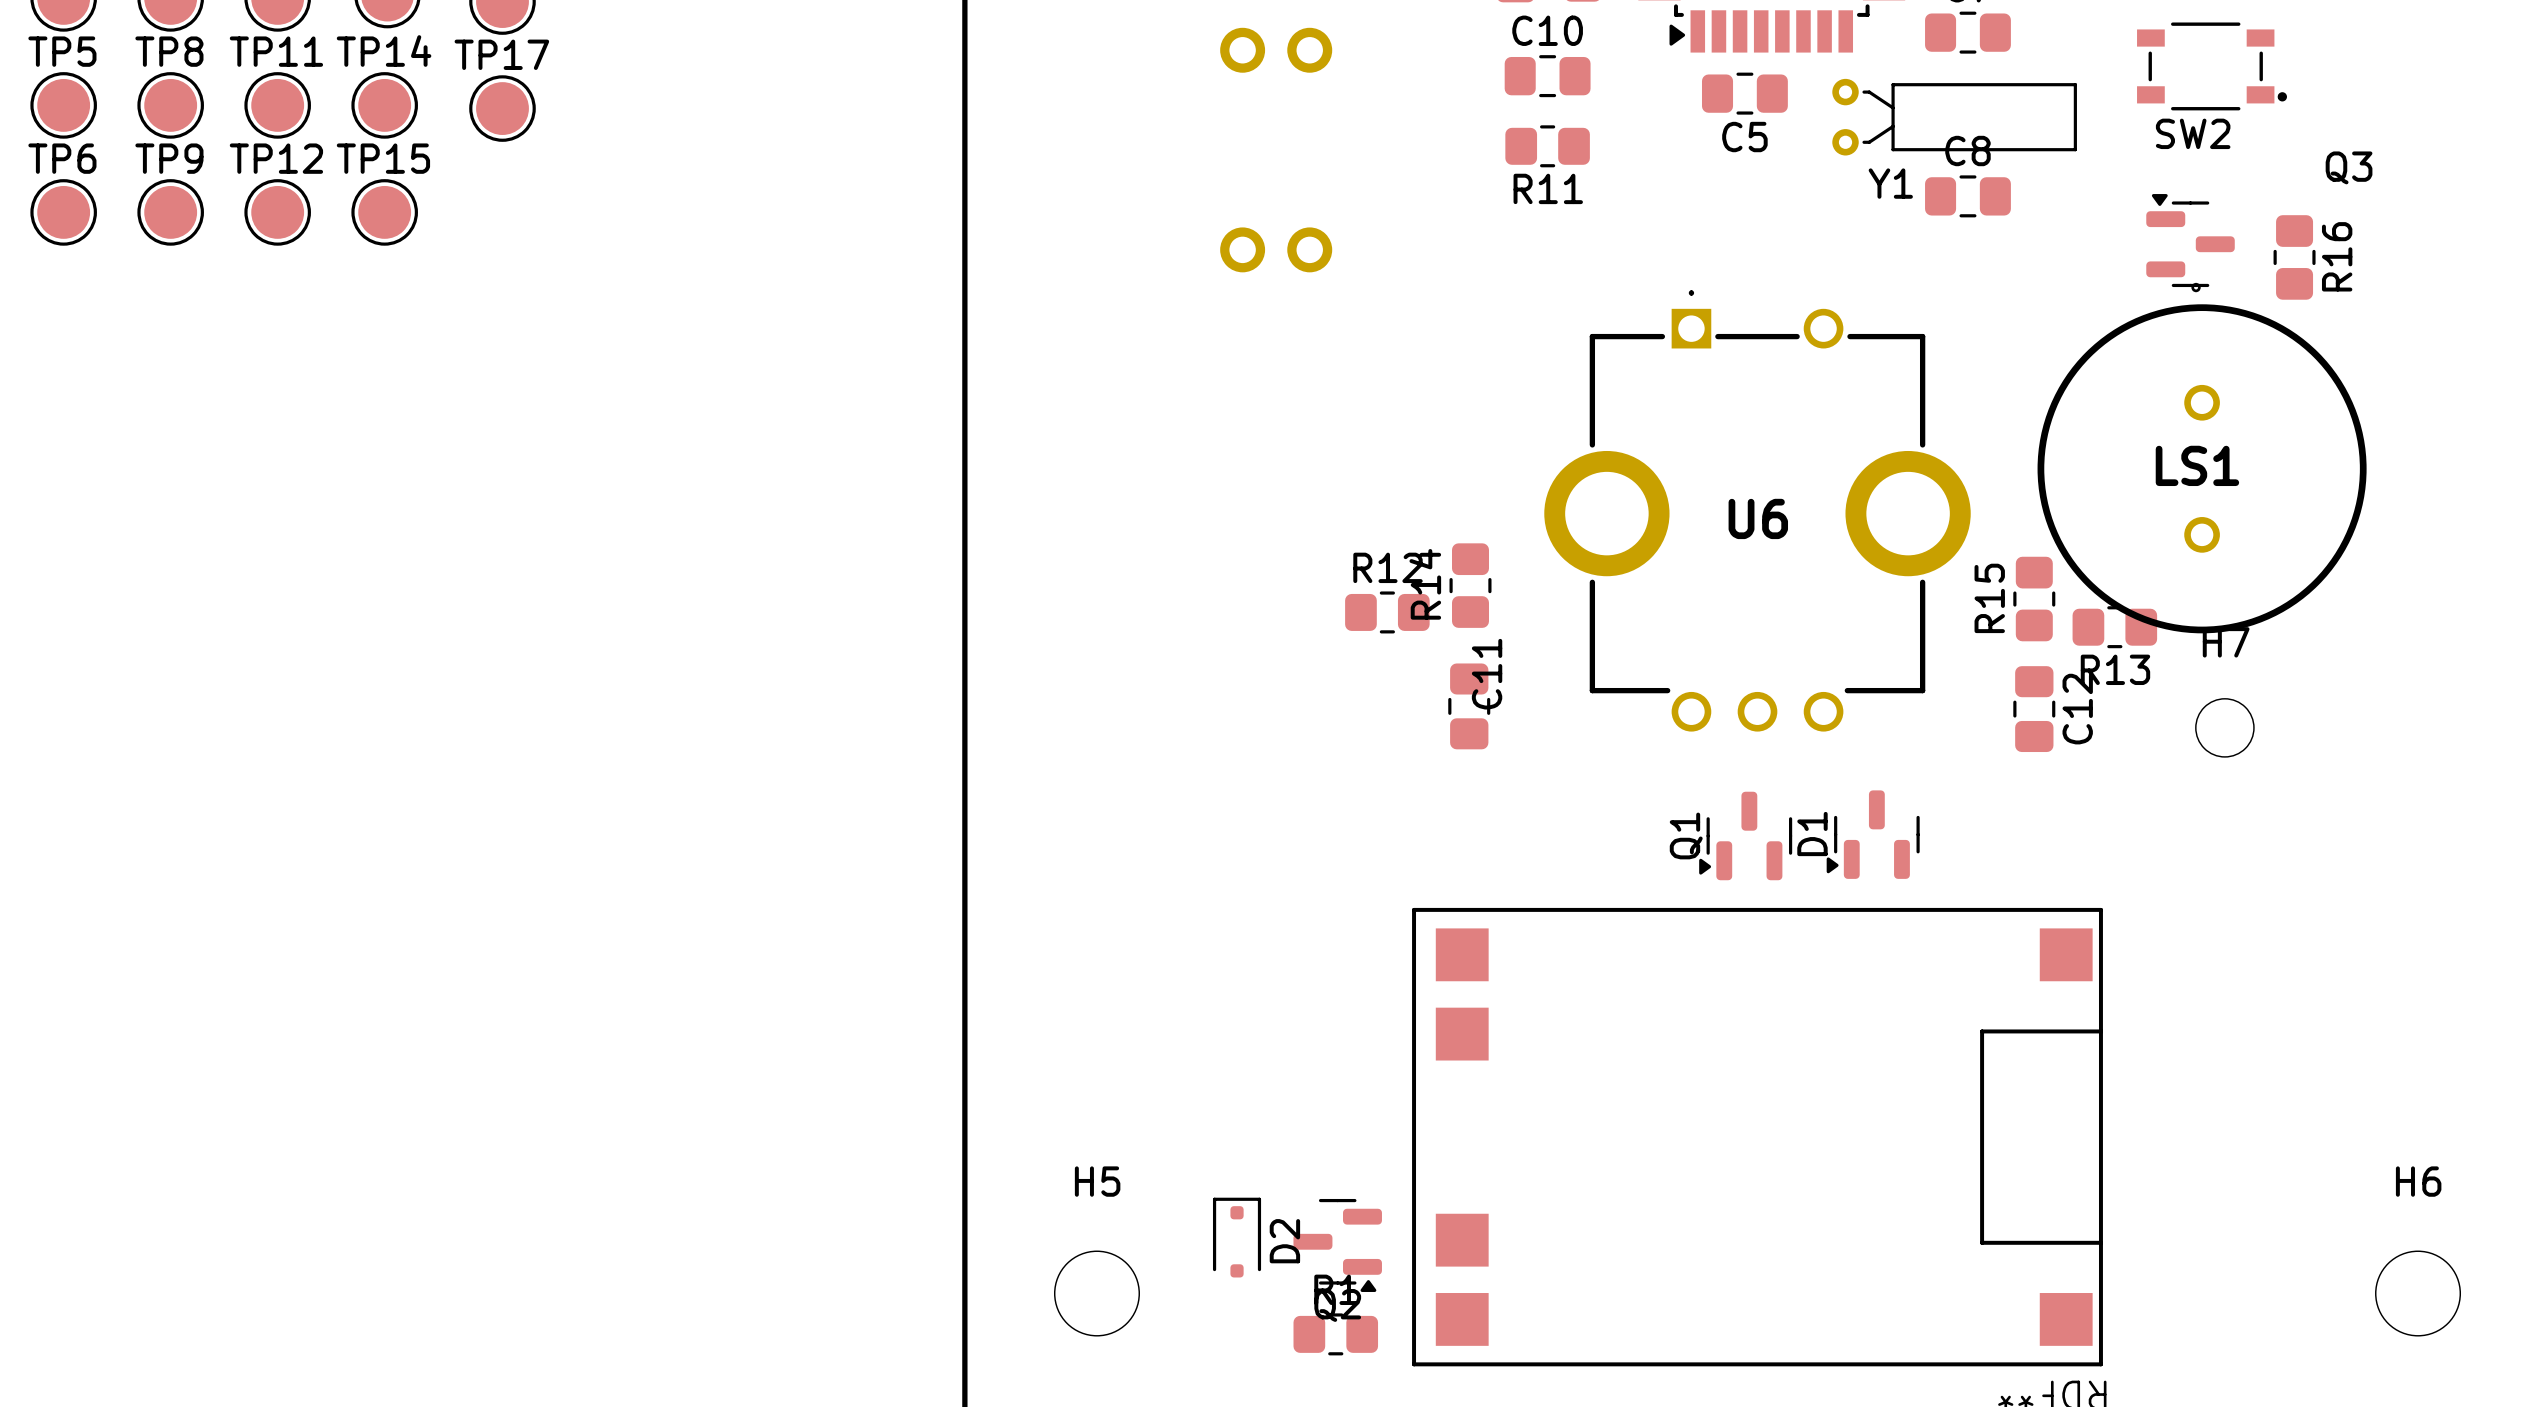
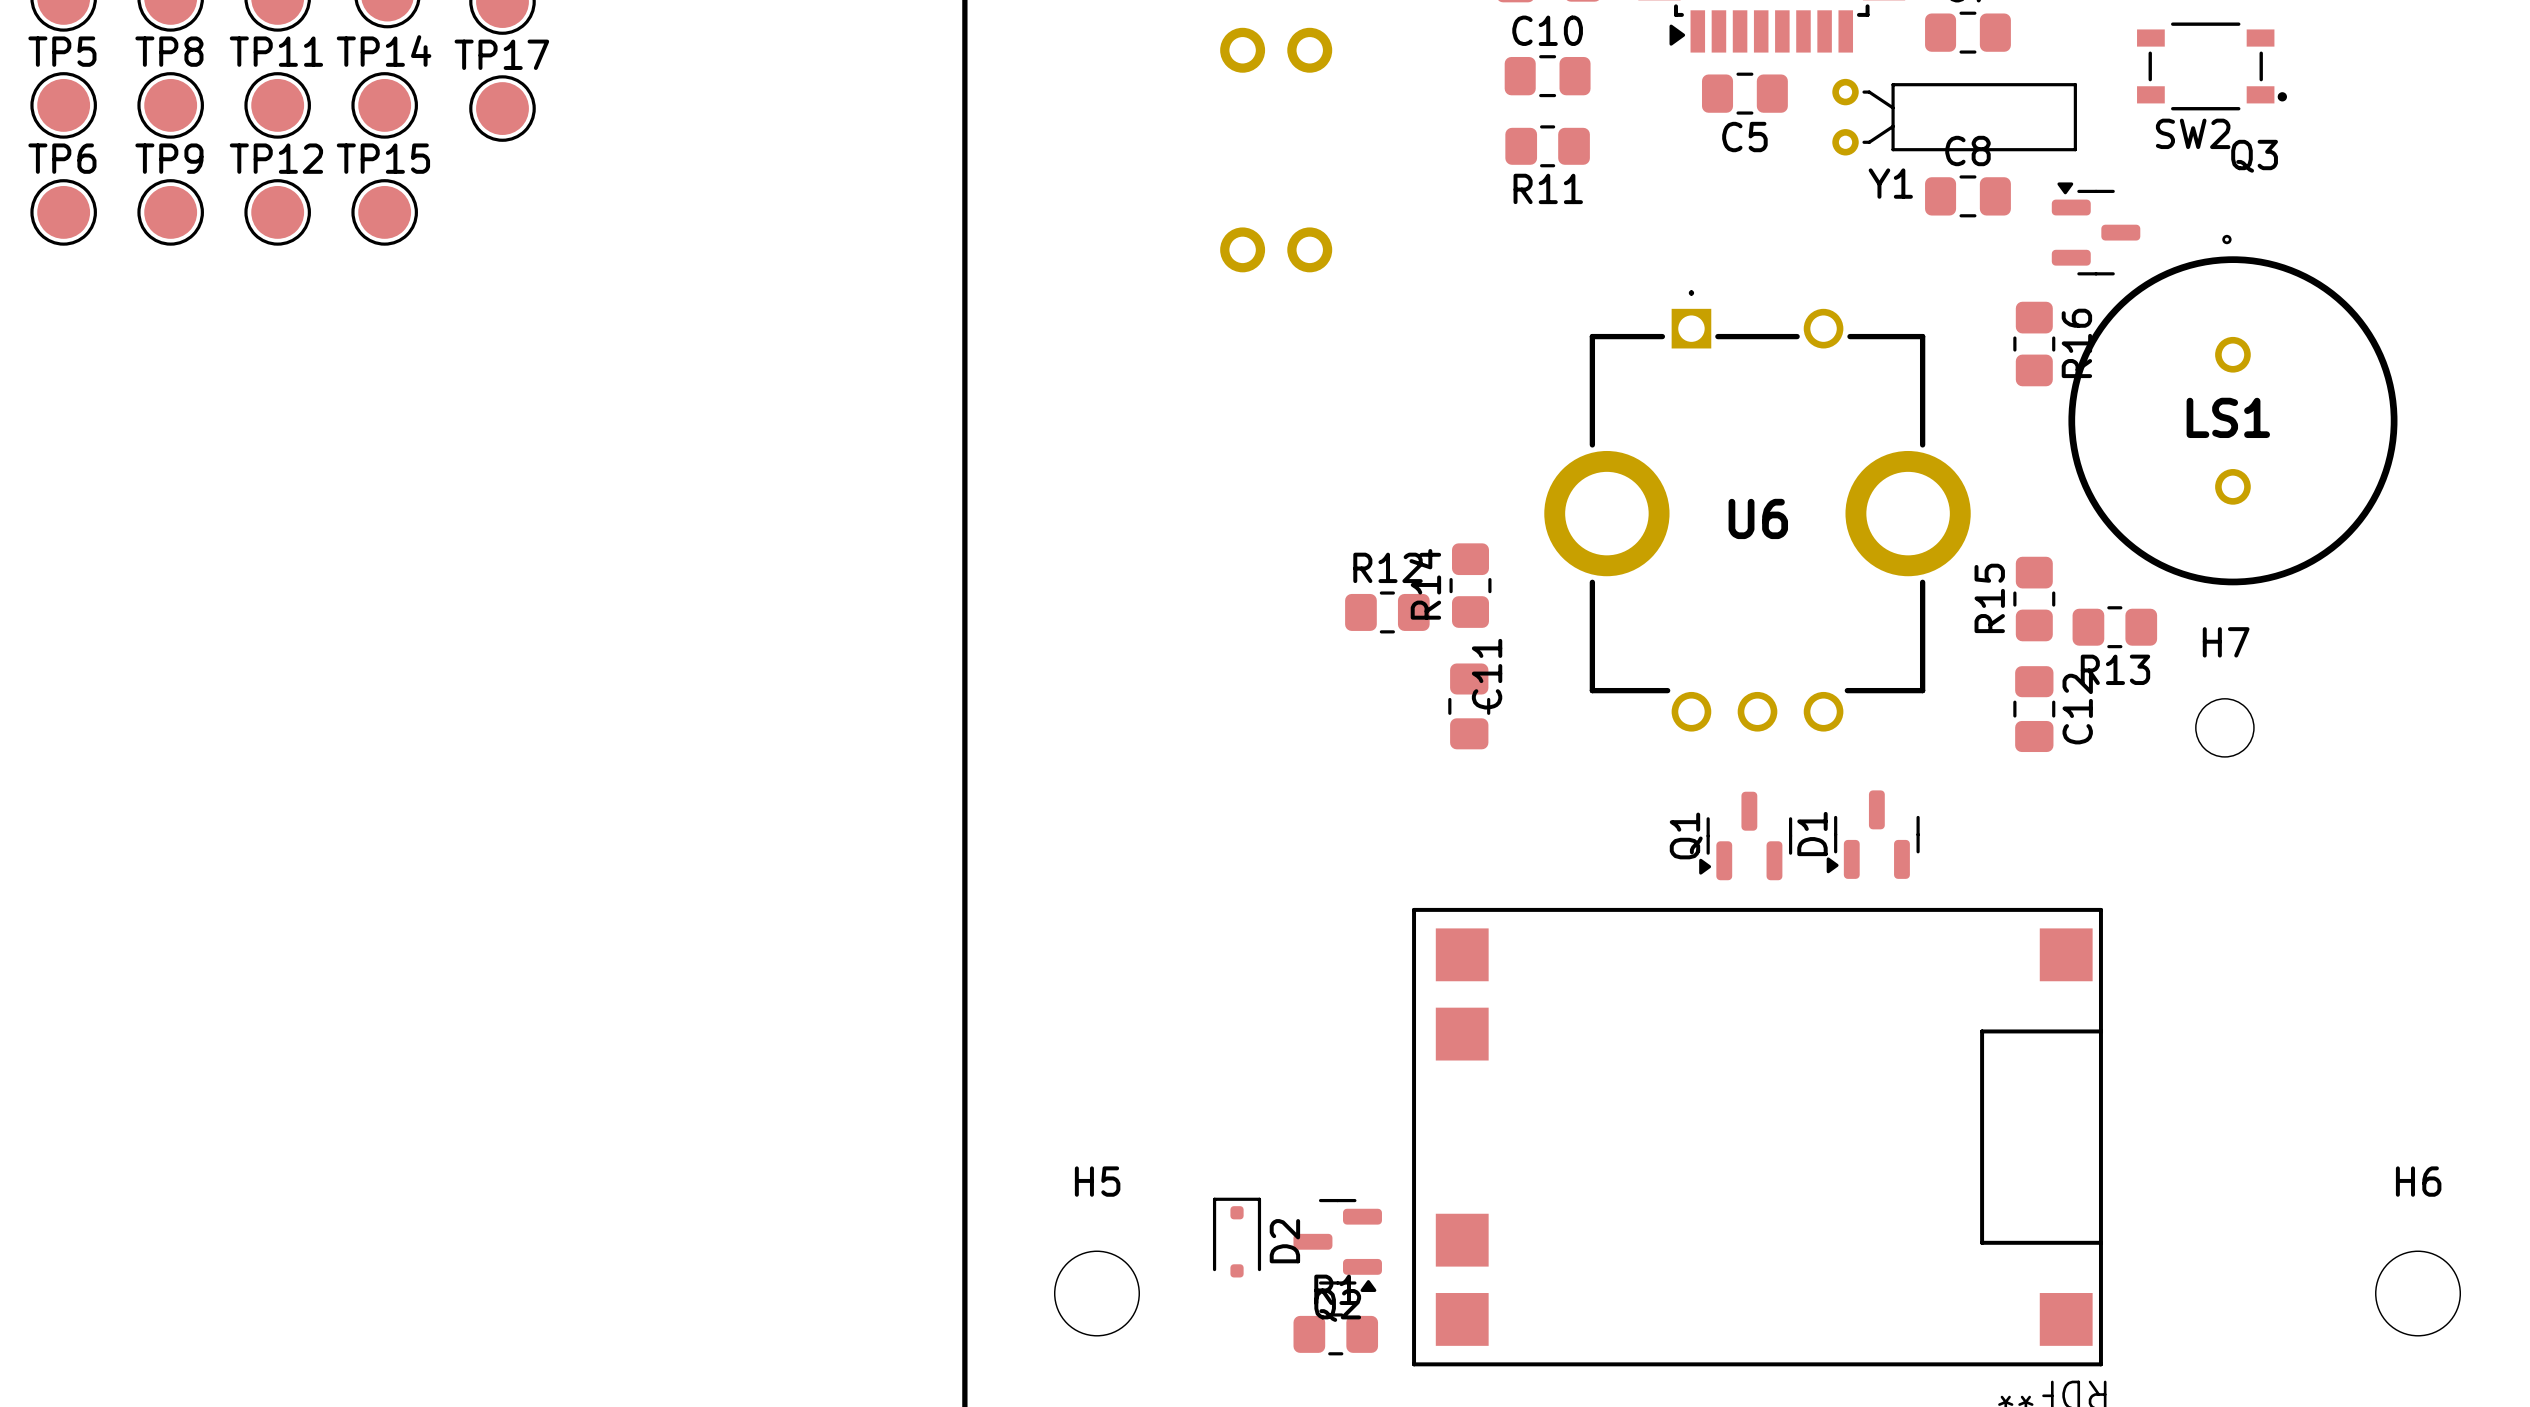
Q3 position: (2190, 240) -> (2096, 228)
R16 position: (2294, 257) -> (2034, 344)
LS1 position: (2202, 458) -> (2232, 410)

